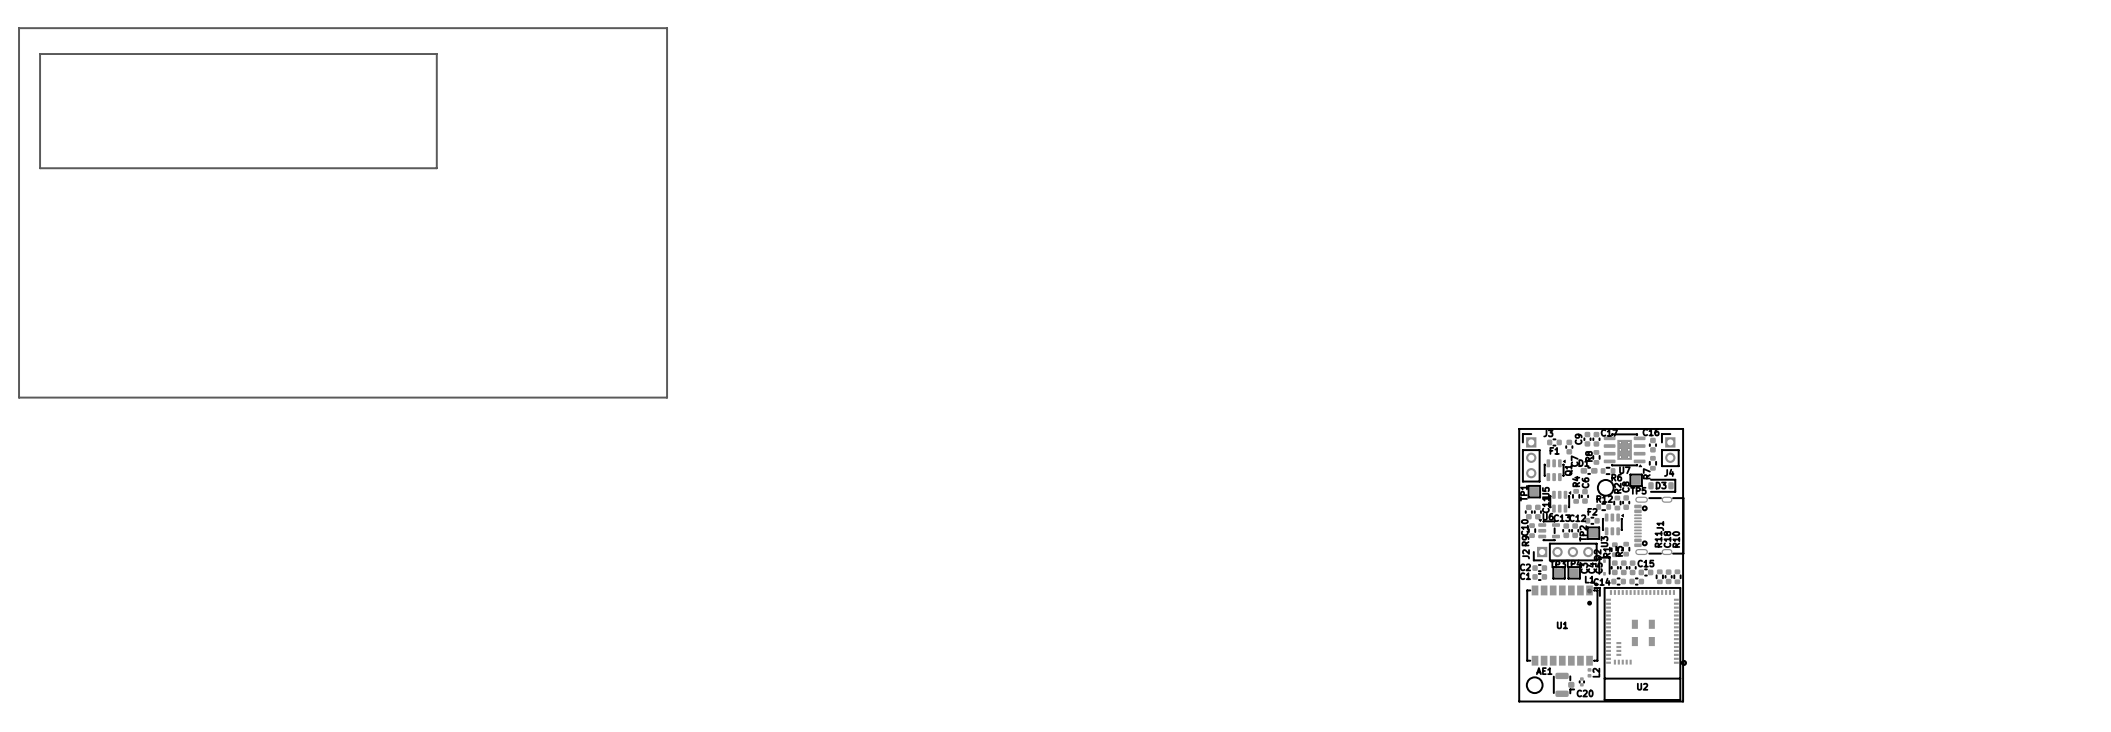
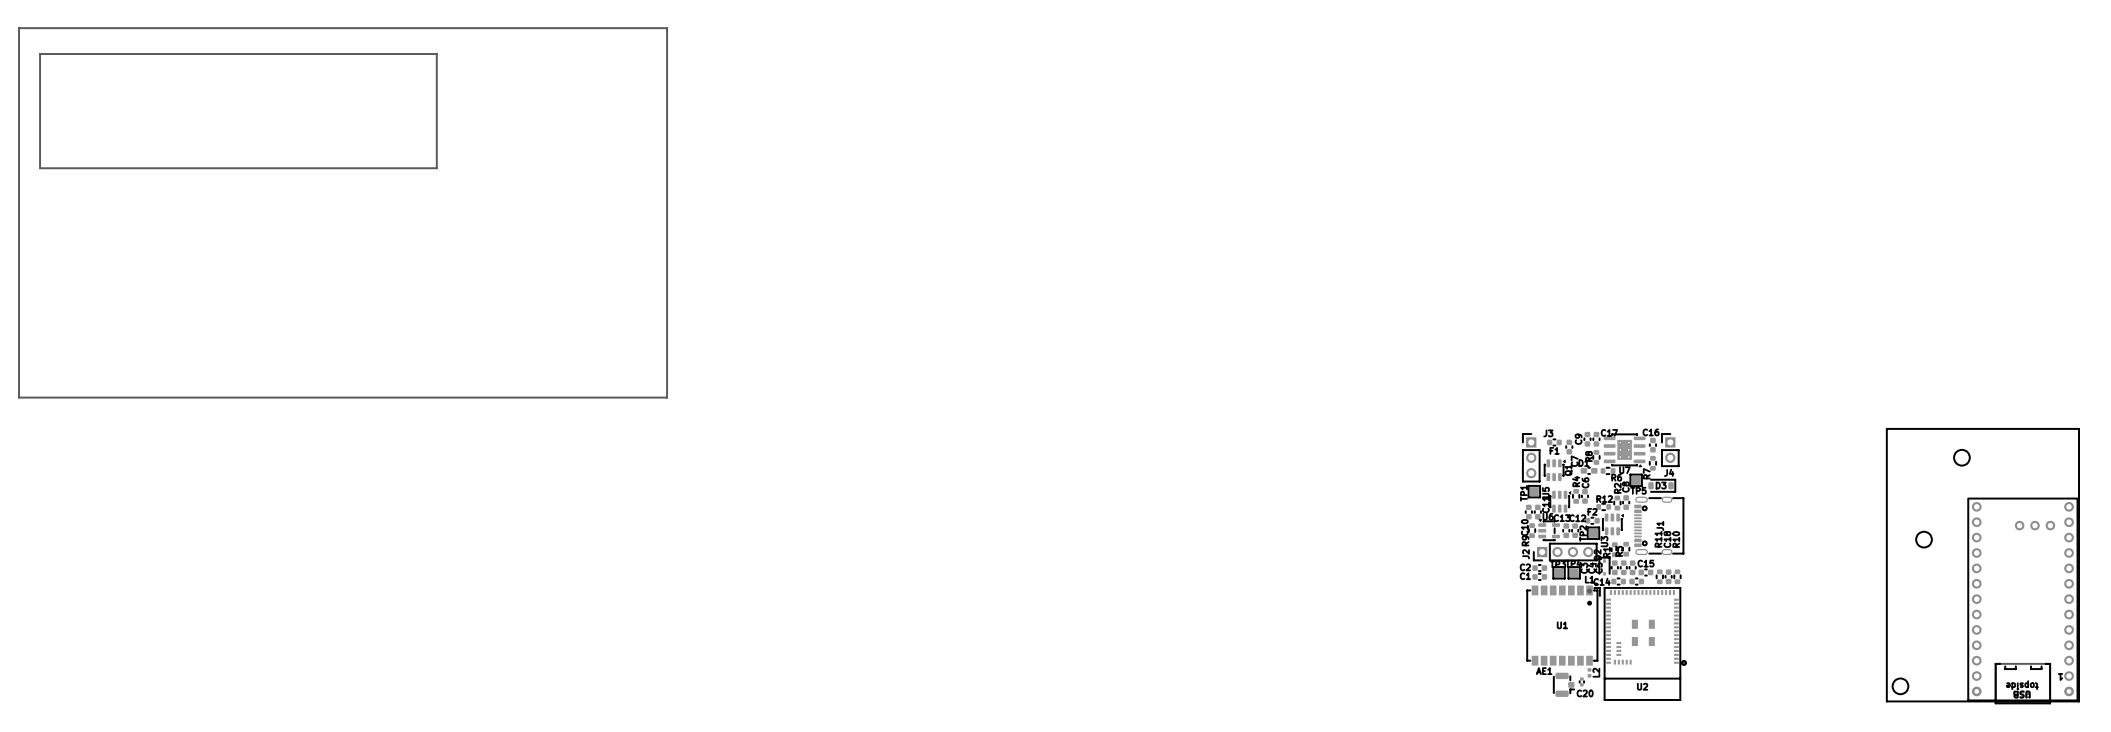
board edge: (1519, 428) (1683, 428) (1683, 701) (1519, 701) (1519, 428) -> none
board edge: none -> (1886, 428) (2079, 428) (2079, 701) (1886, 701) (1886, 428)
round board edge: none -> [1953, 449, 1970, 466]
round board edge: [1597, 479, 1614, 496] -> none
round board edge: none -> [1915, 531, 1933, 548]
part: none -> (2022, 600)
round board edge: [1526, 677, 1543, 694] -> none
round board edge: none -> [1892, 678, 1909, 695]

